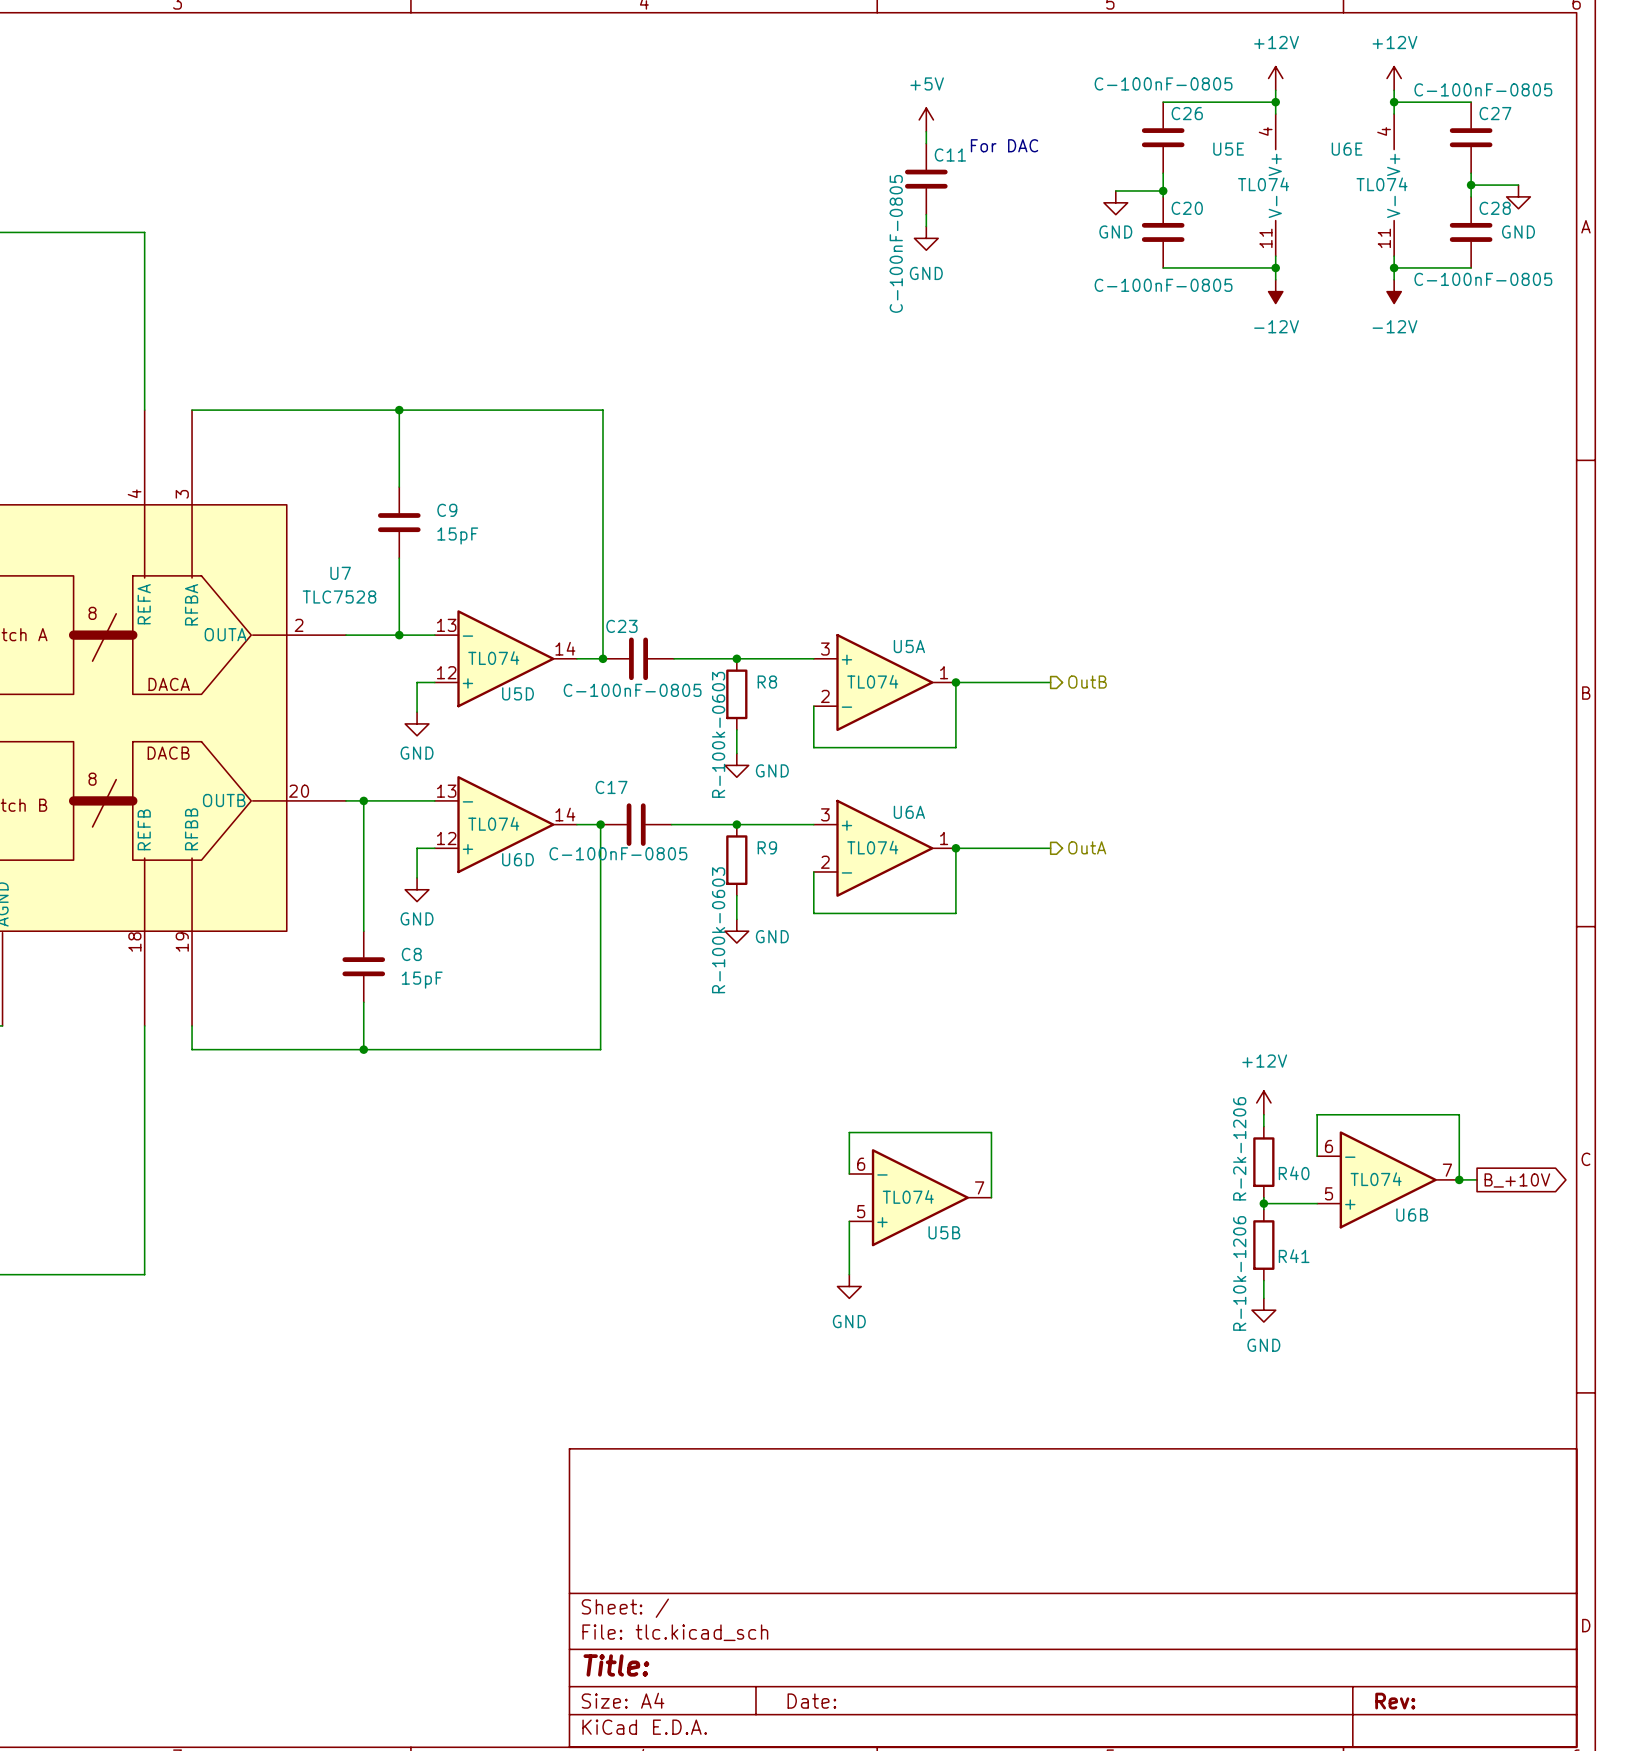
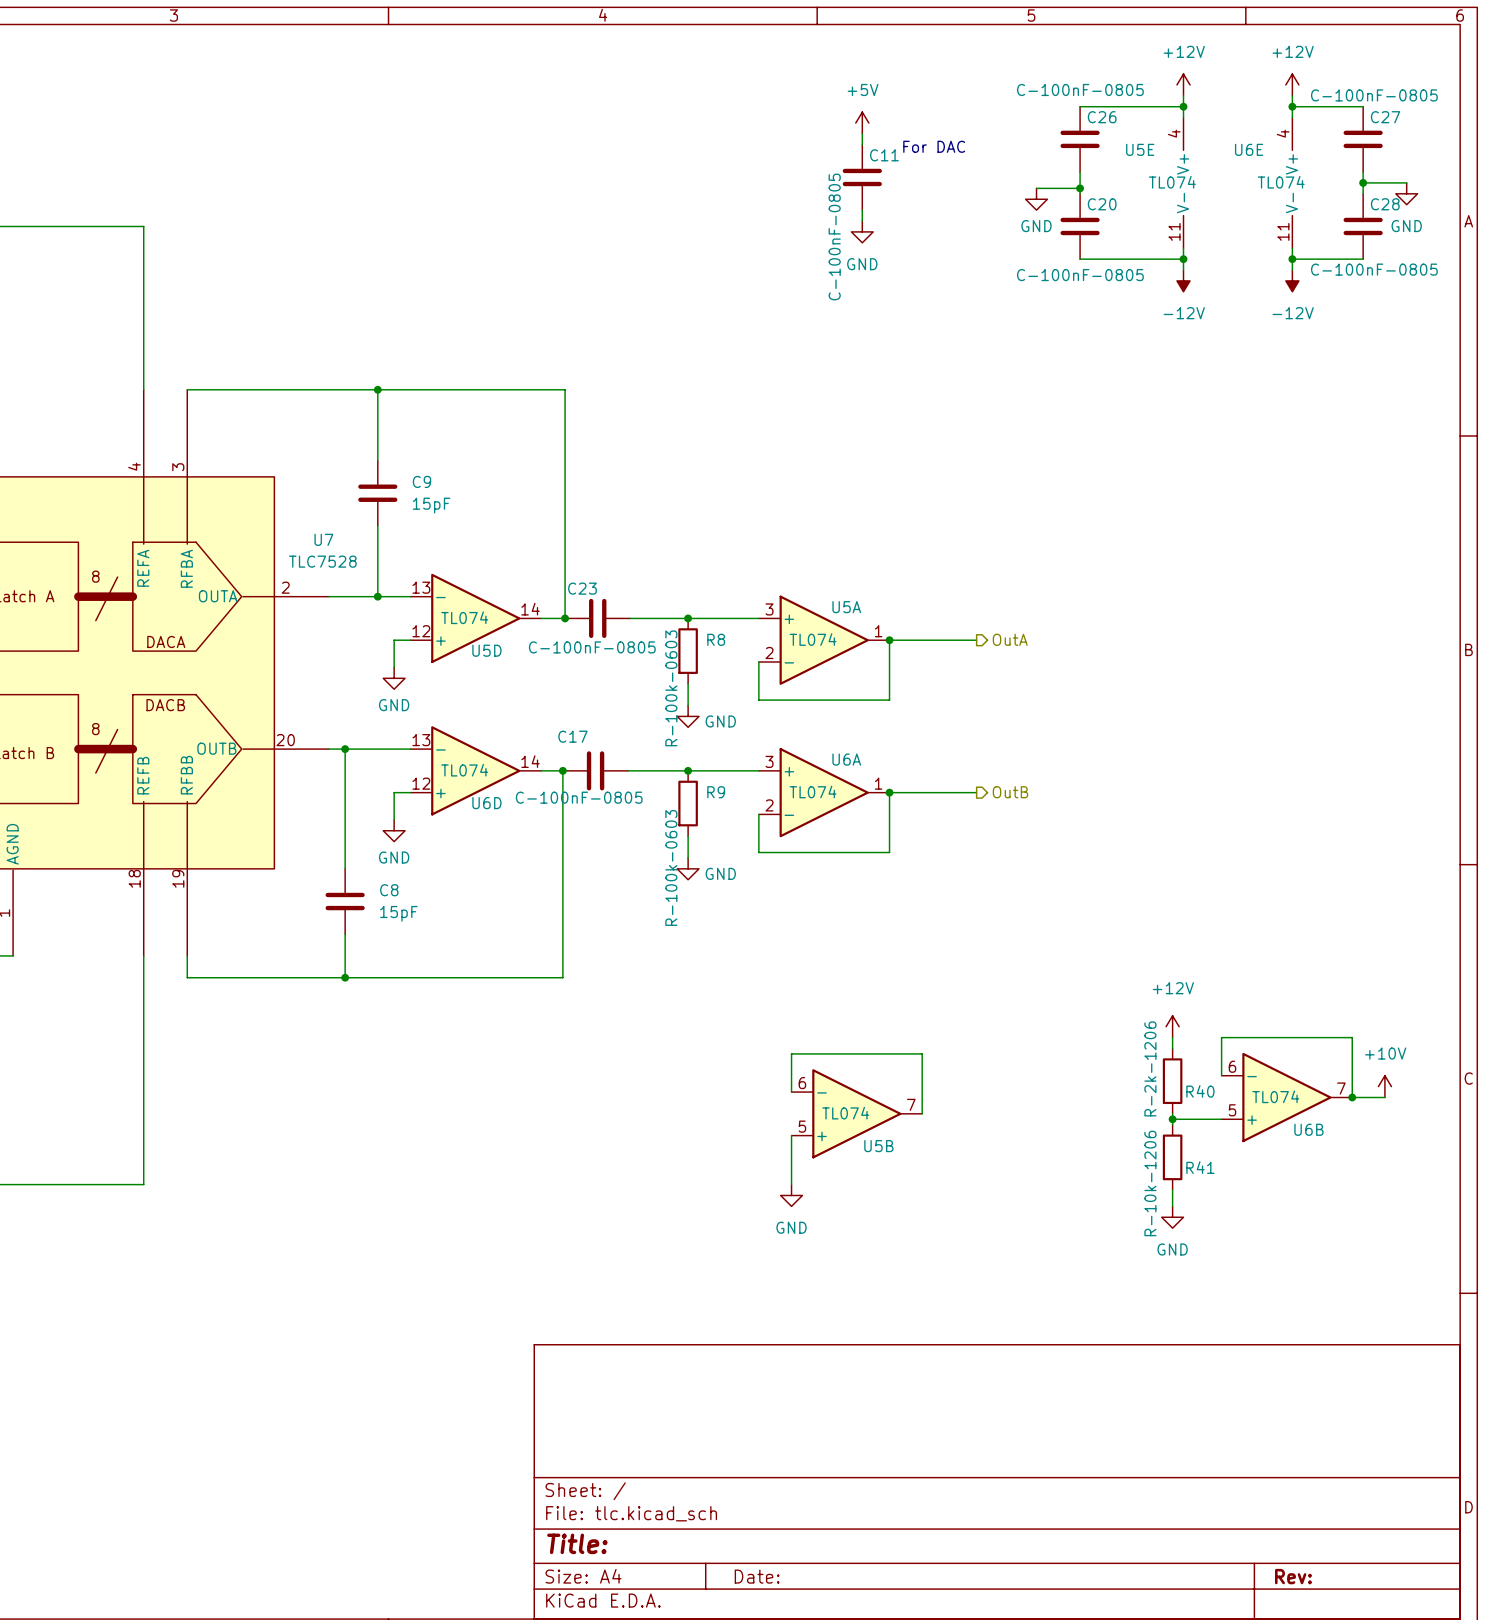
hierarchical label: OutB (1087, 682) -> OutA (1010, 639)
hierarchical label: OutA (1087, 847) -> OutB (1010, 792)
power symbol: none -> +10V (1384, 1086)
wire: none -> (1368, 1097) (1384, 1097)
global label: B_+10V (1517, 1180) -> none

